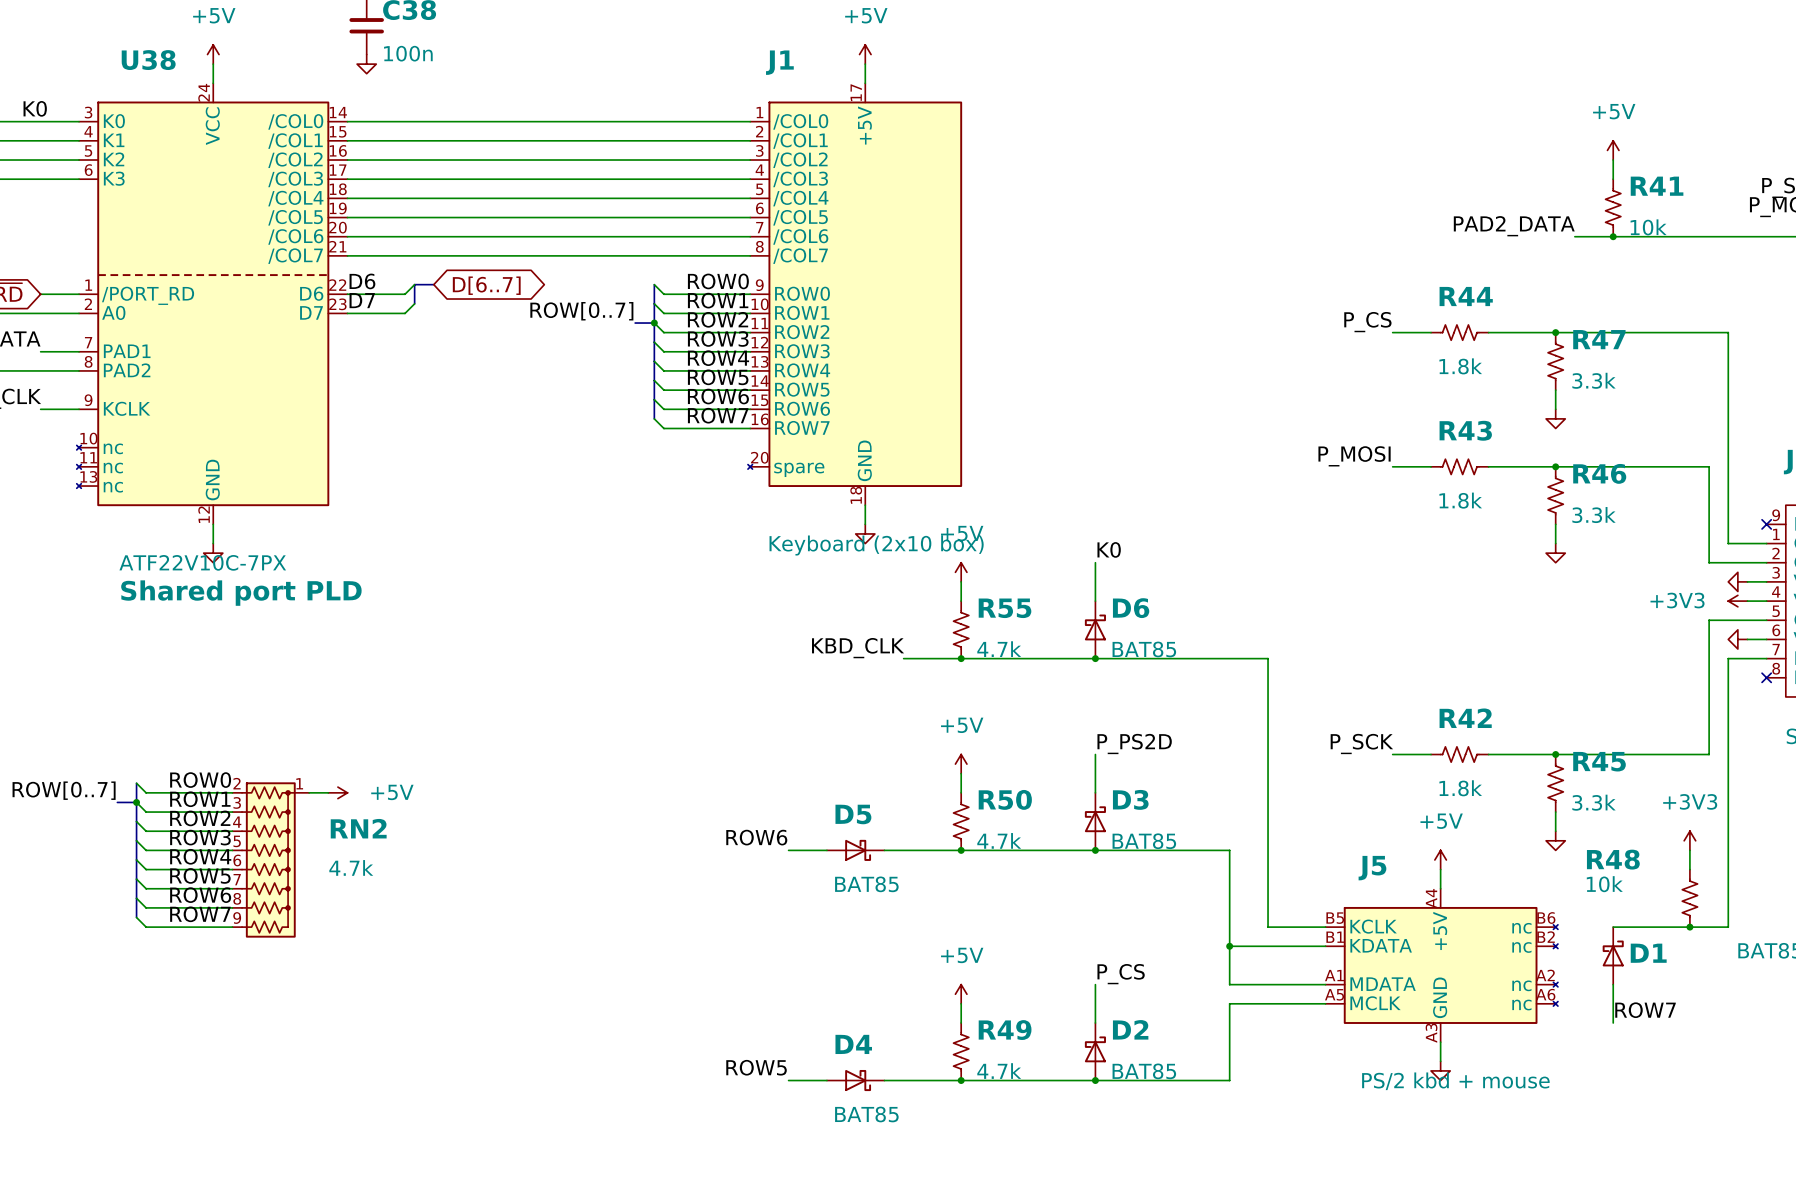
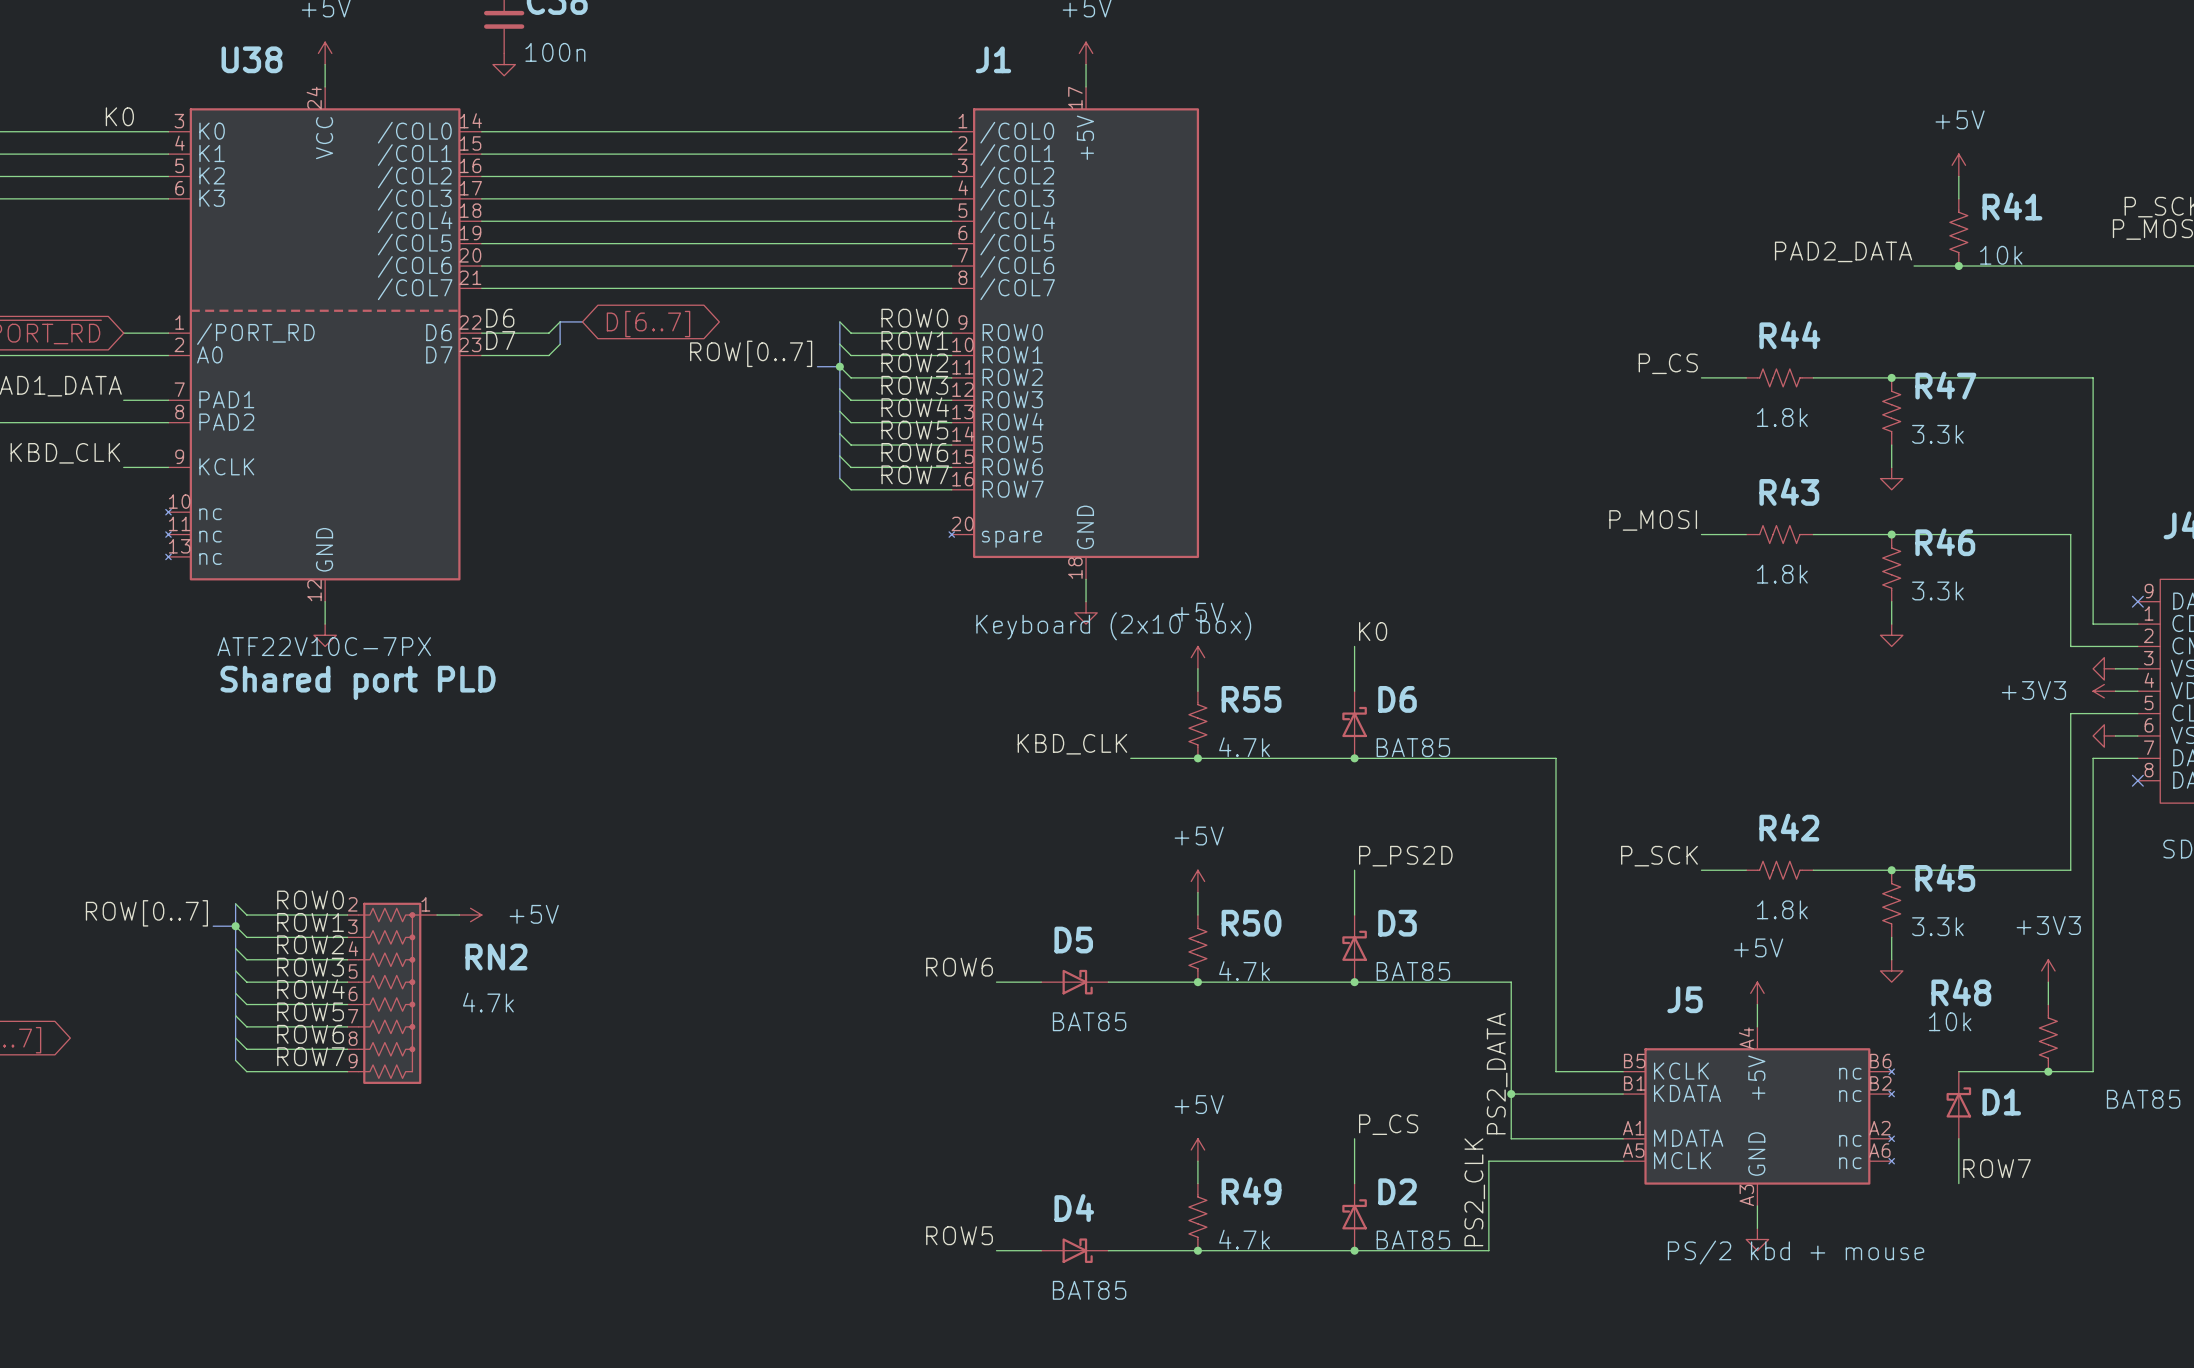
label: none -> PS2_DATA (1497, 1073)
wire: (1229, 1003) (1229, 1080) (1210, 1080) -> (1511, 1161) (1488, 1161) (1488, 1250)
label: none -> PS2_CLK (1474, 1192)

